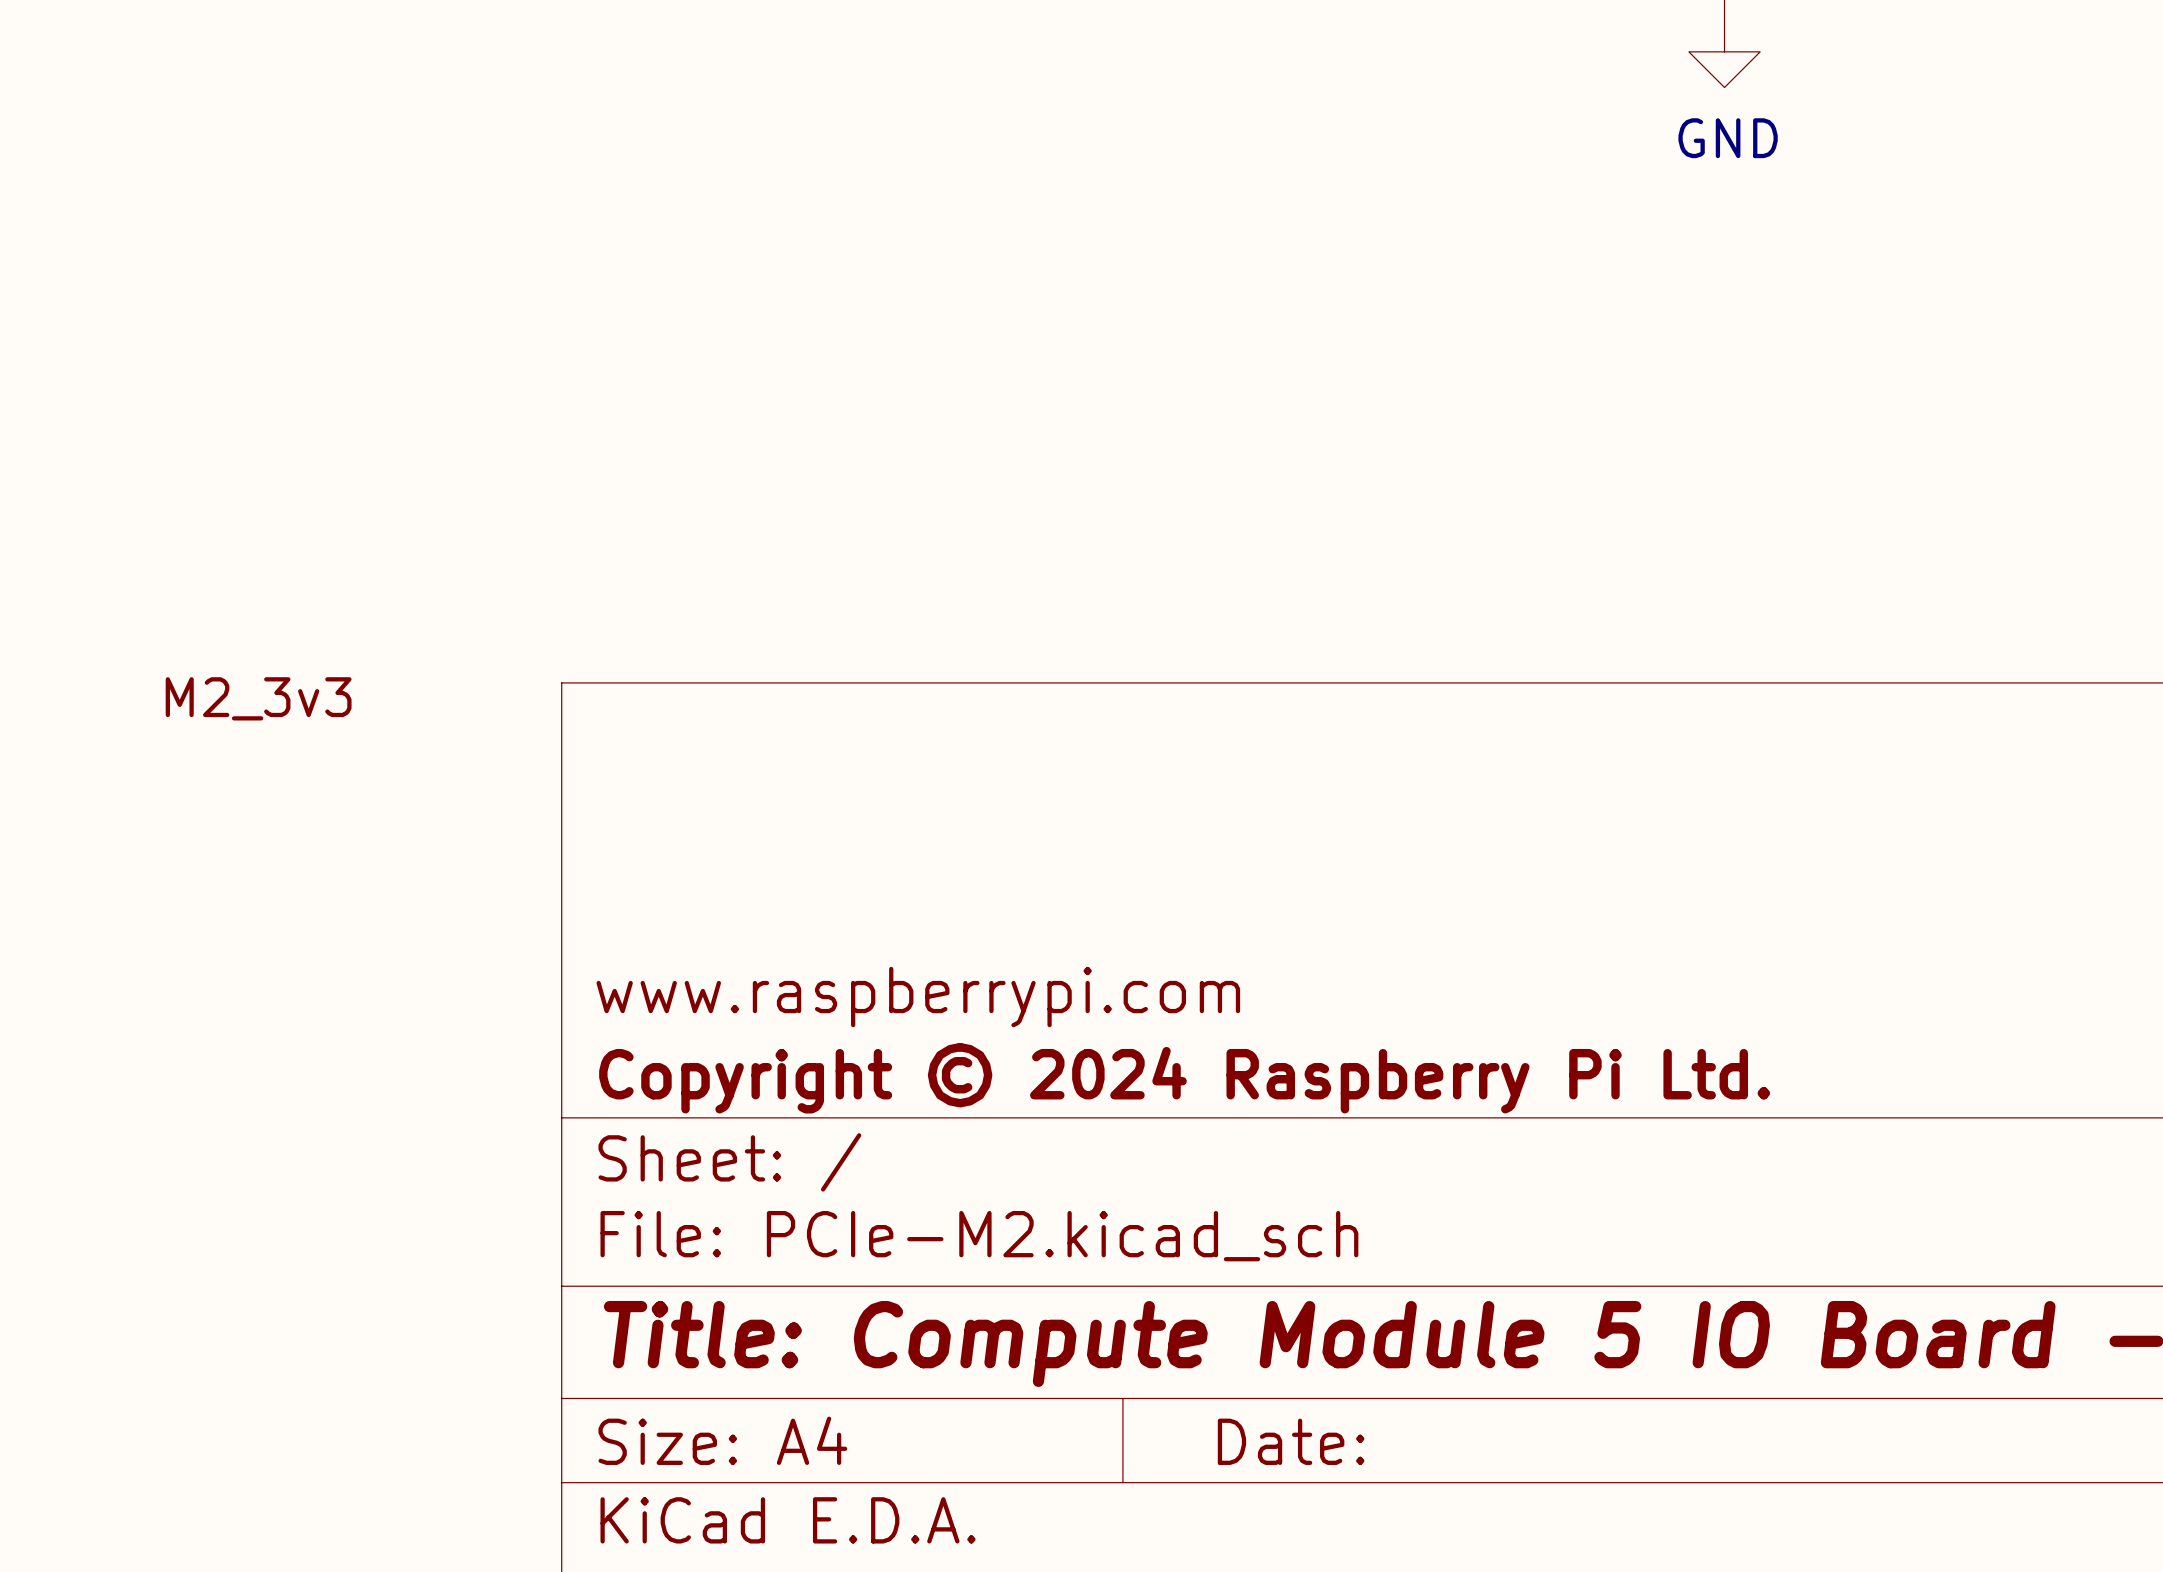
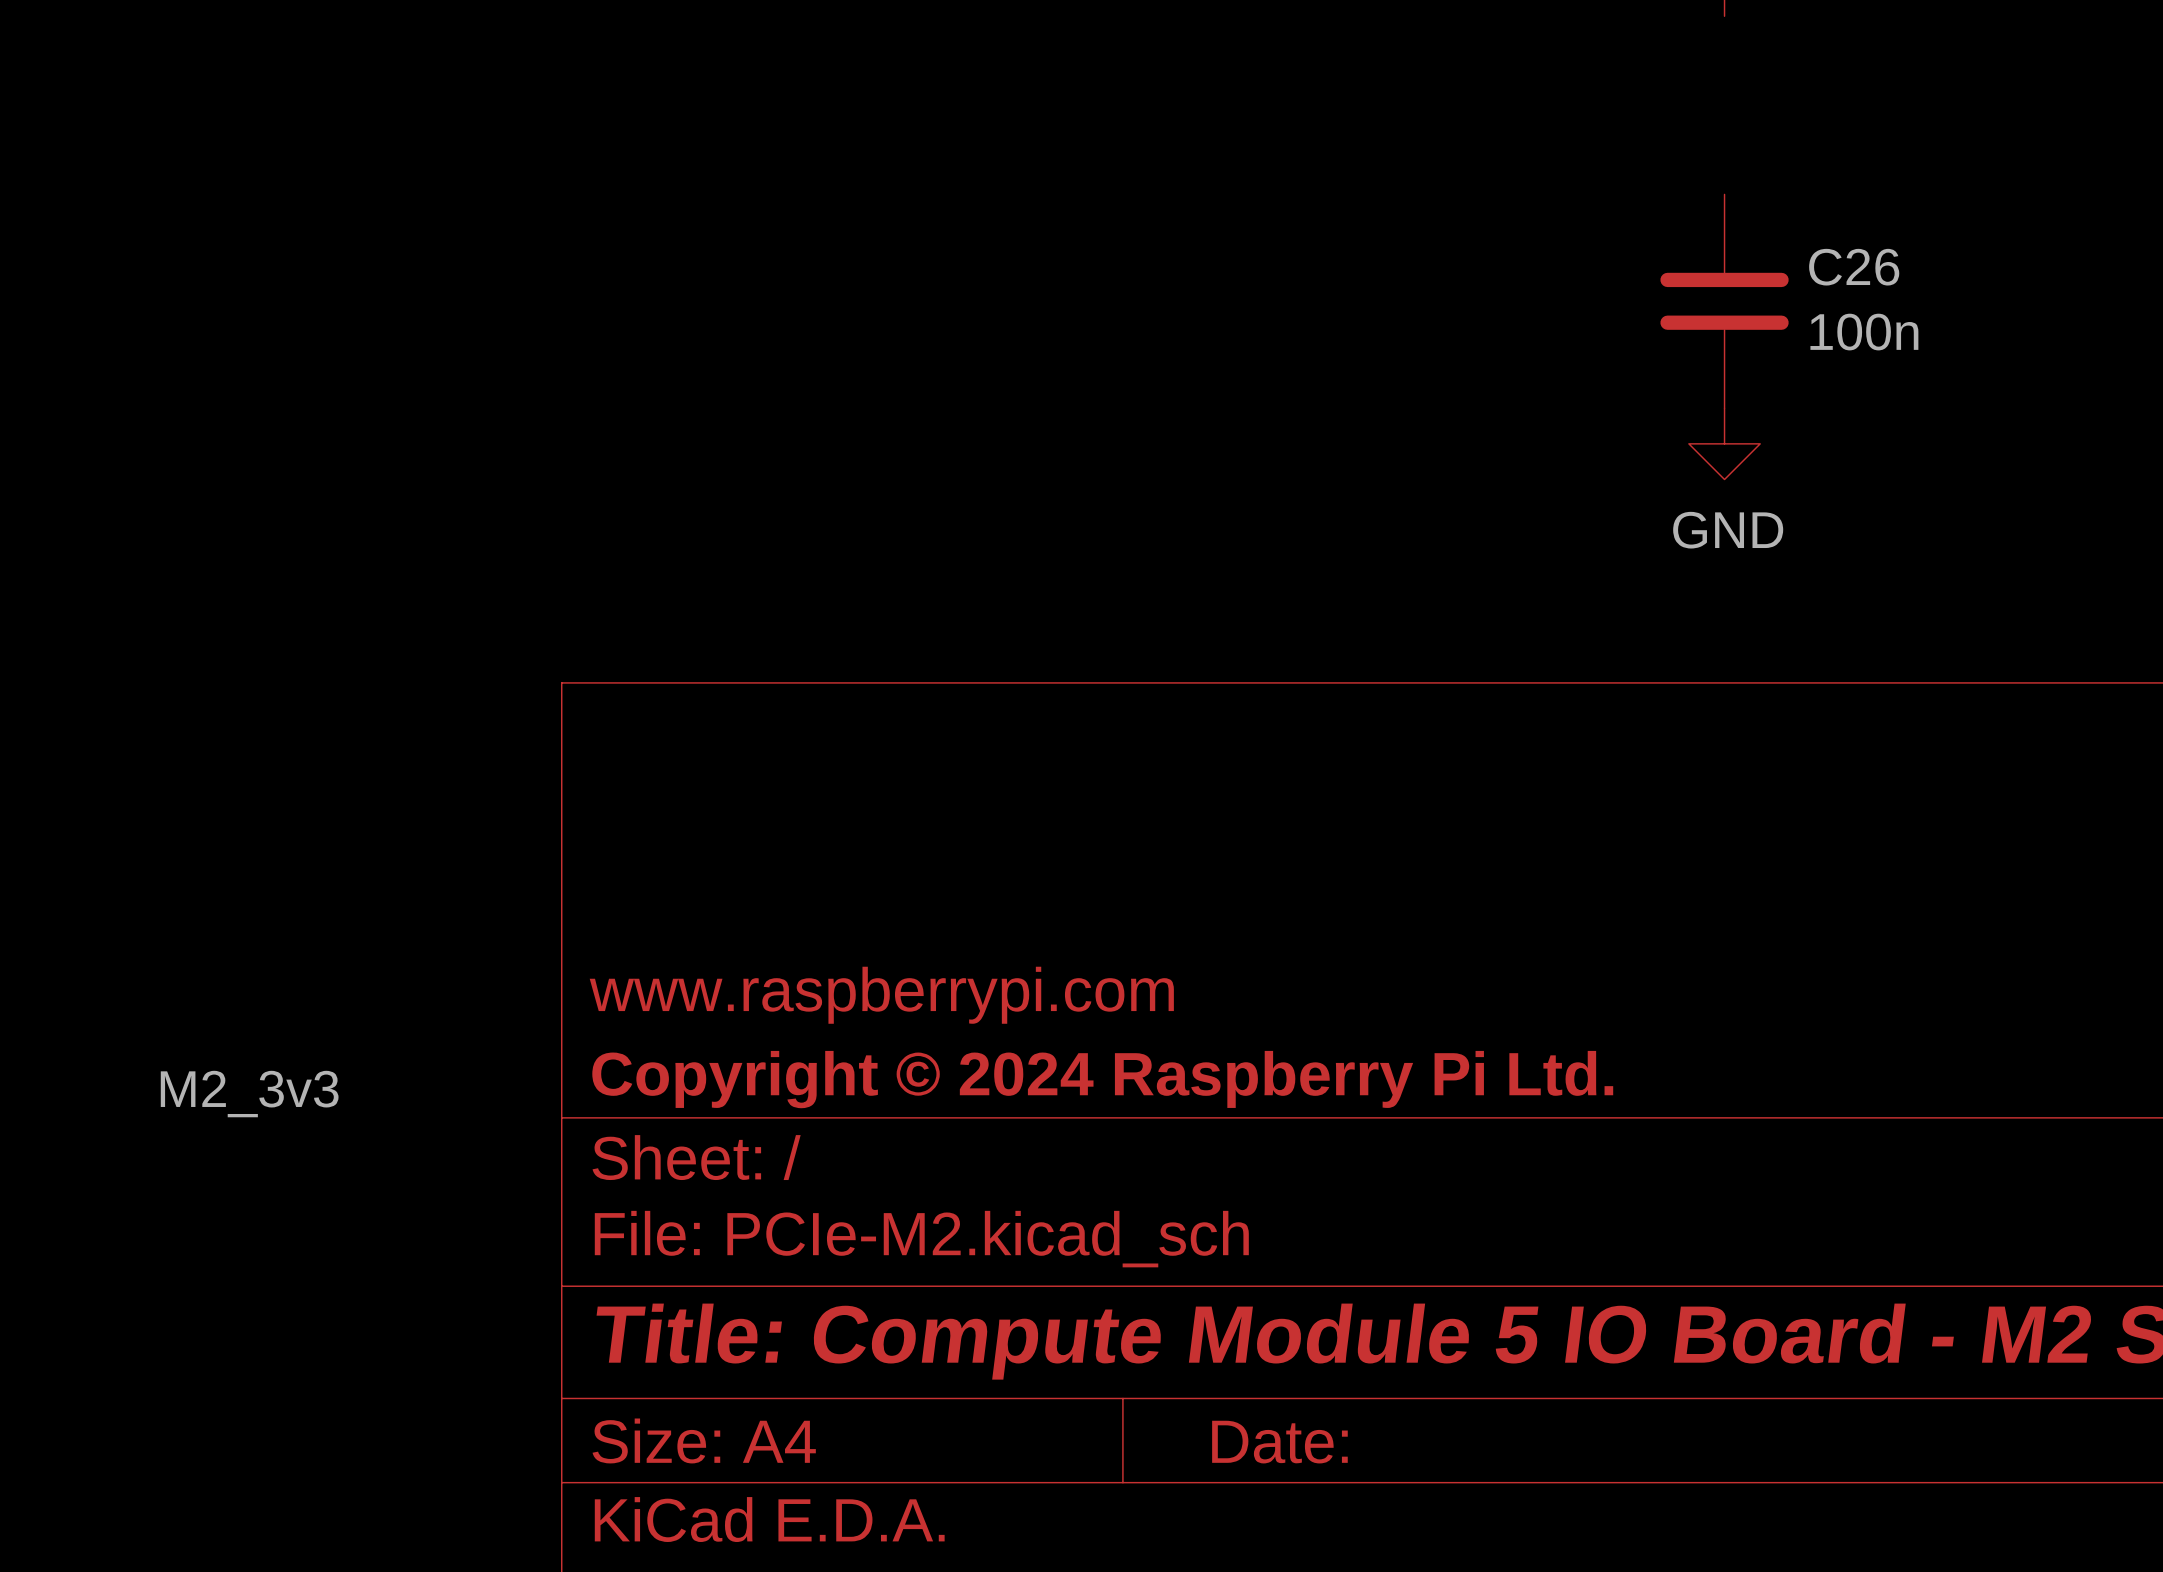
power symbol position: GND (1724, 51) -> GND (1724, 443)
C26: none -> 100n (1724, 301)
label position: M2_3v3 (258, 698) -> M2_3v3 (249, 1094)

